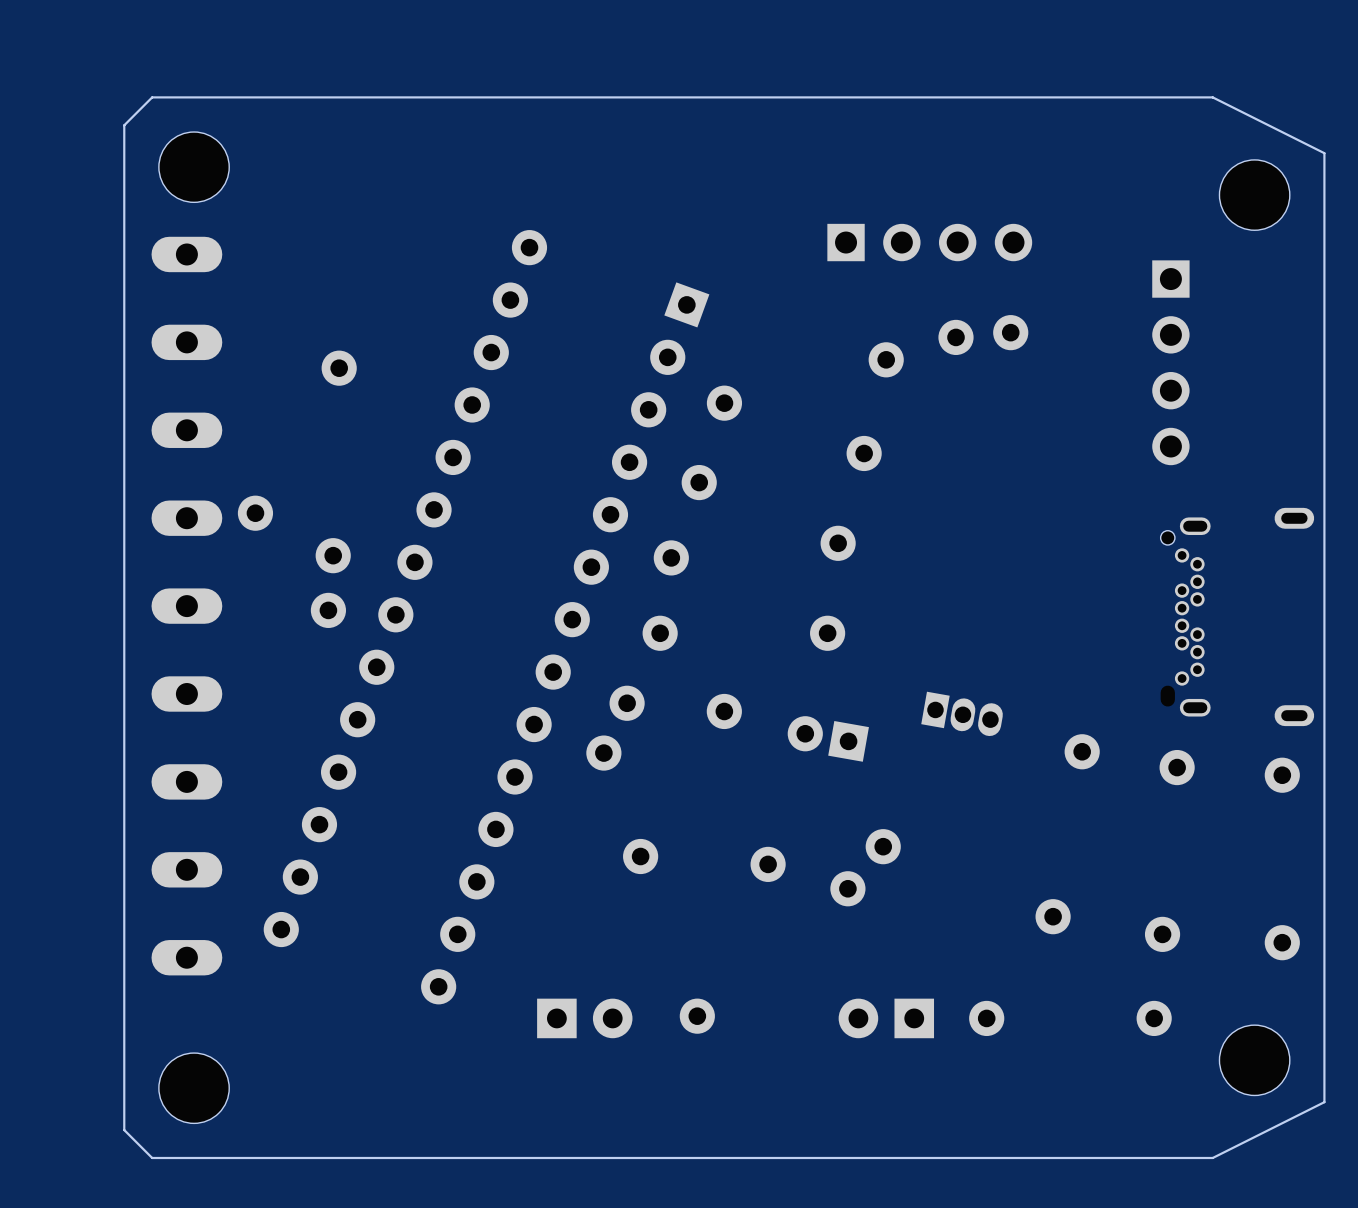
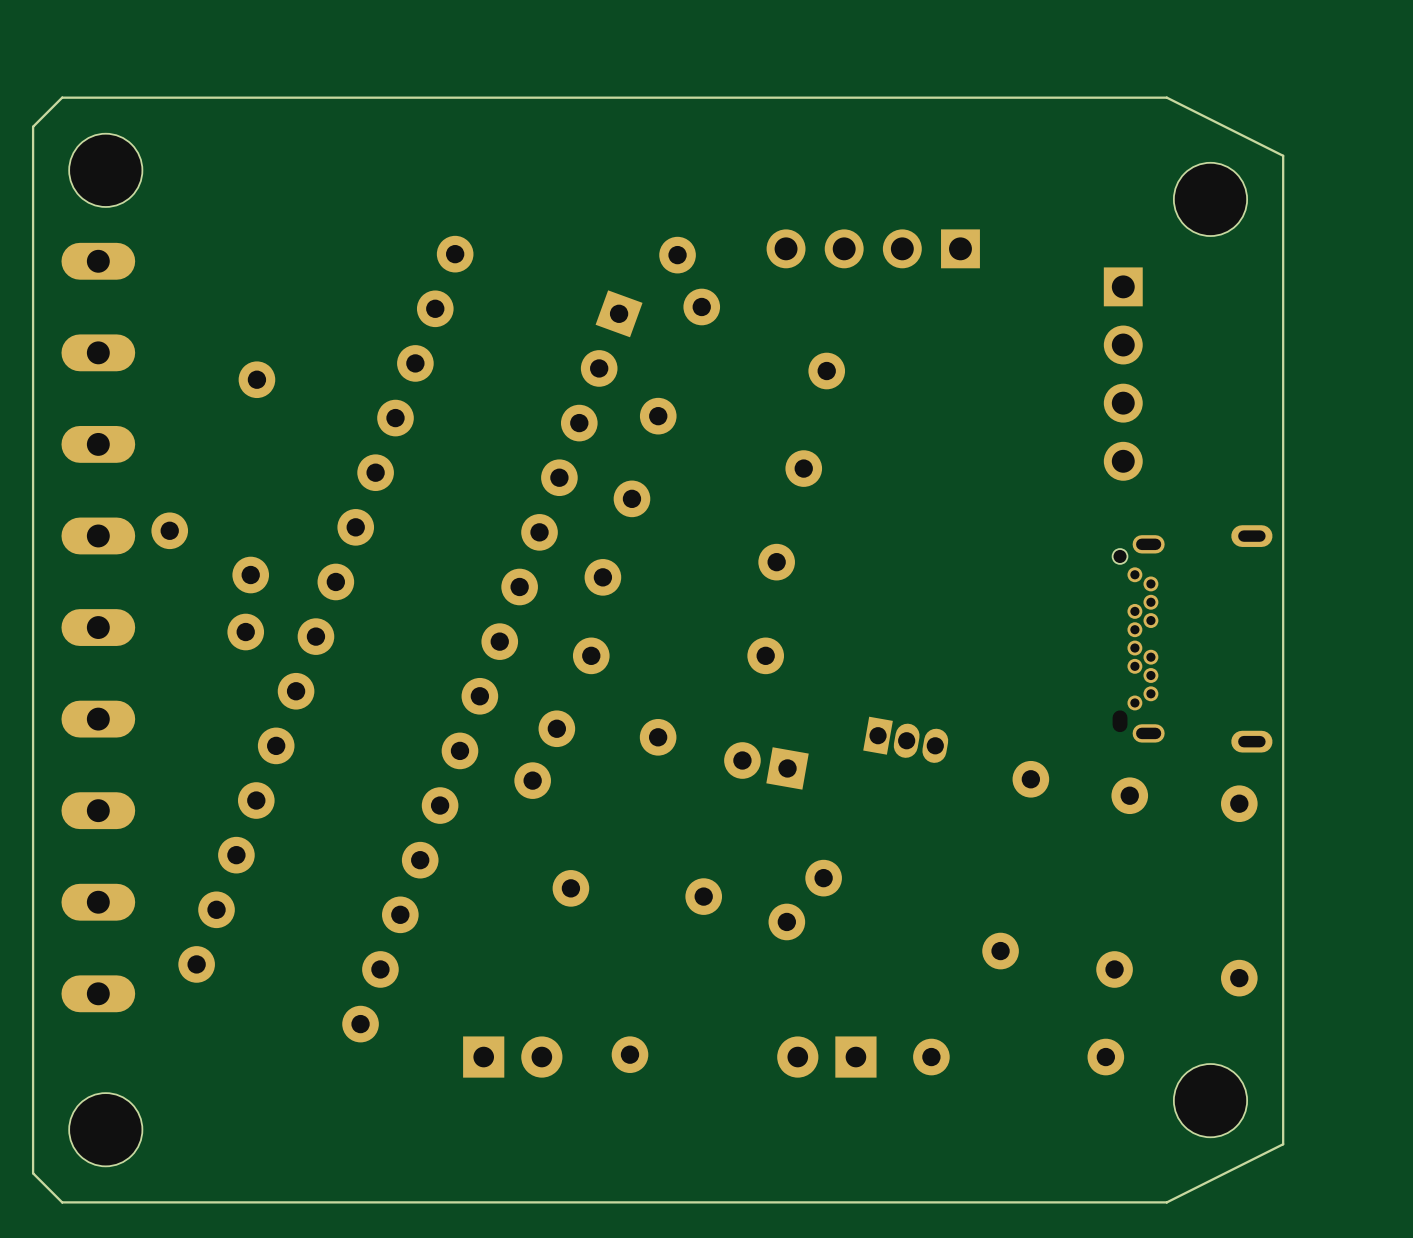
part rotation: 0° (929, 242) -> 180° (873, 248)
part: none -> (689, 281)
part: (983, 335) -> none

